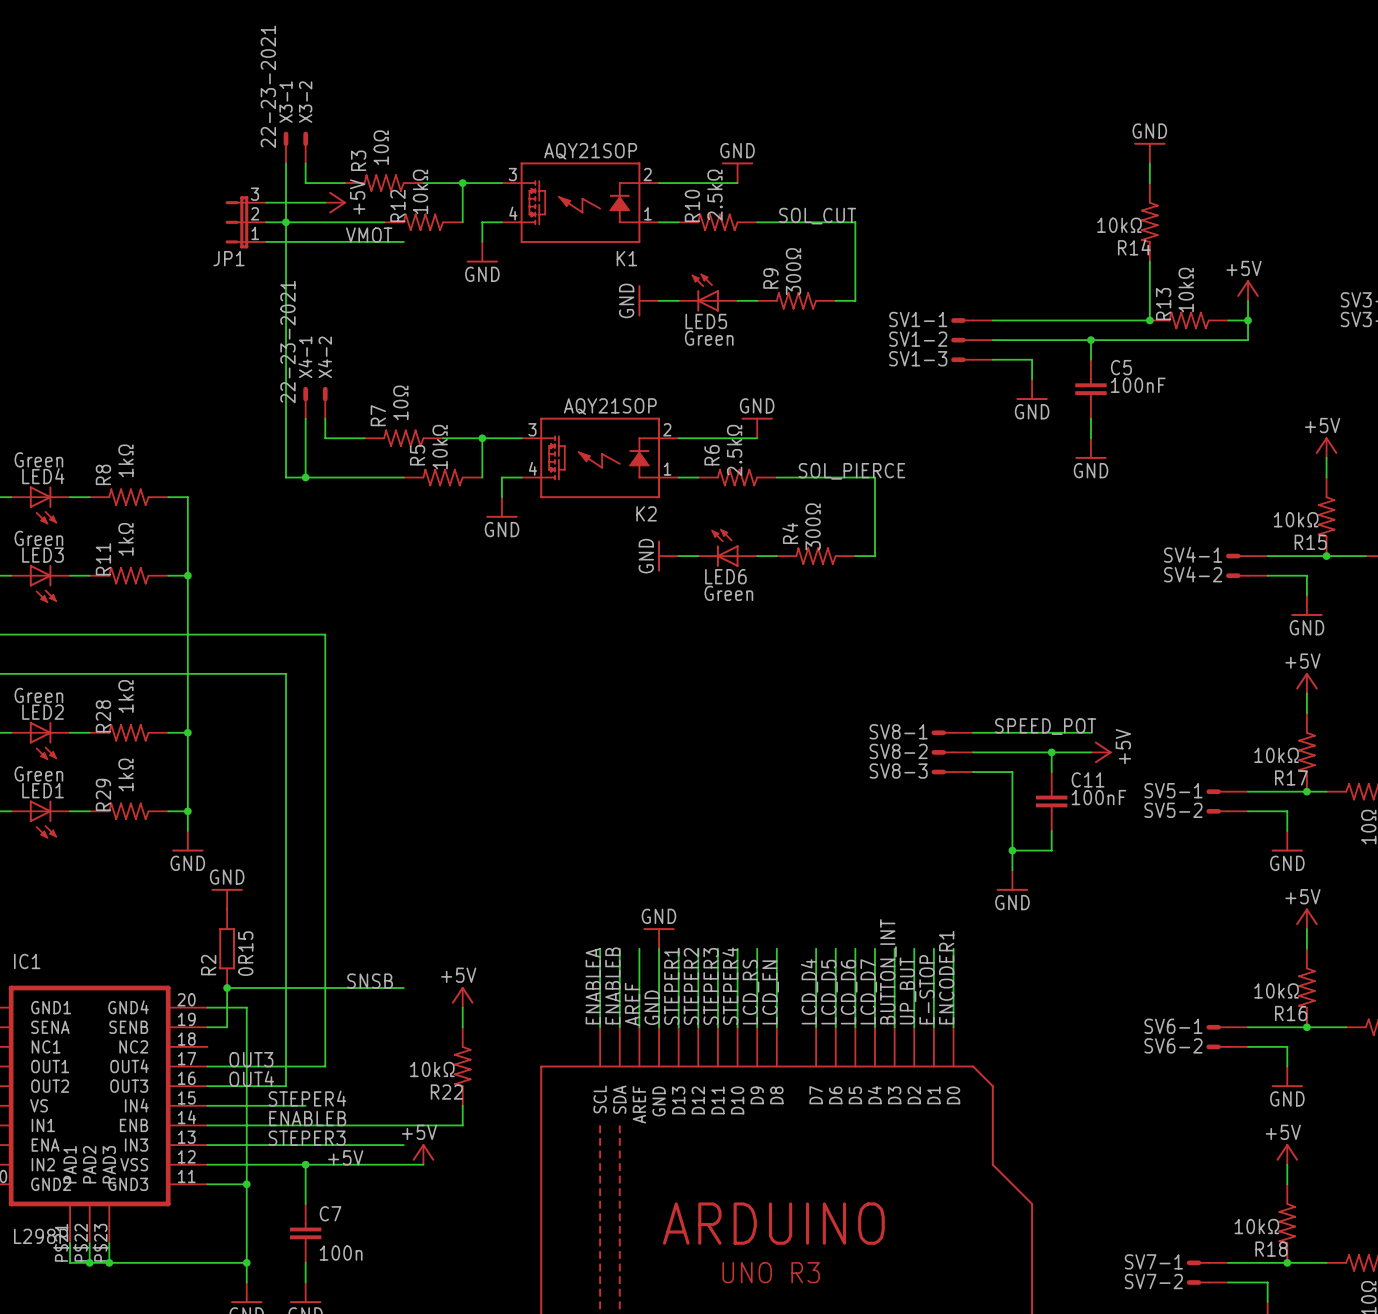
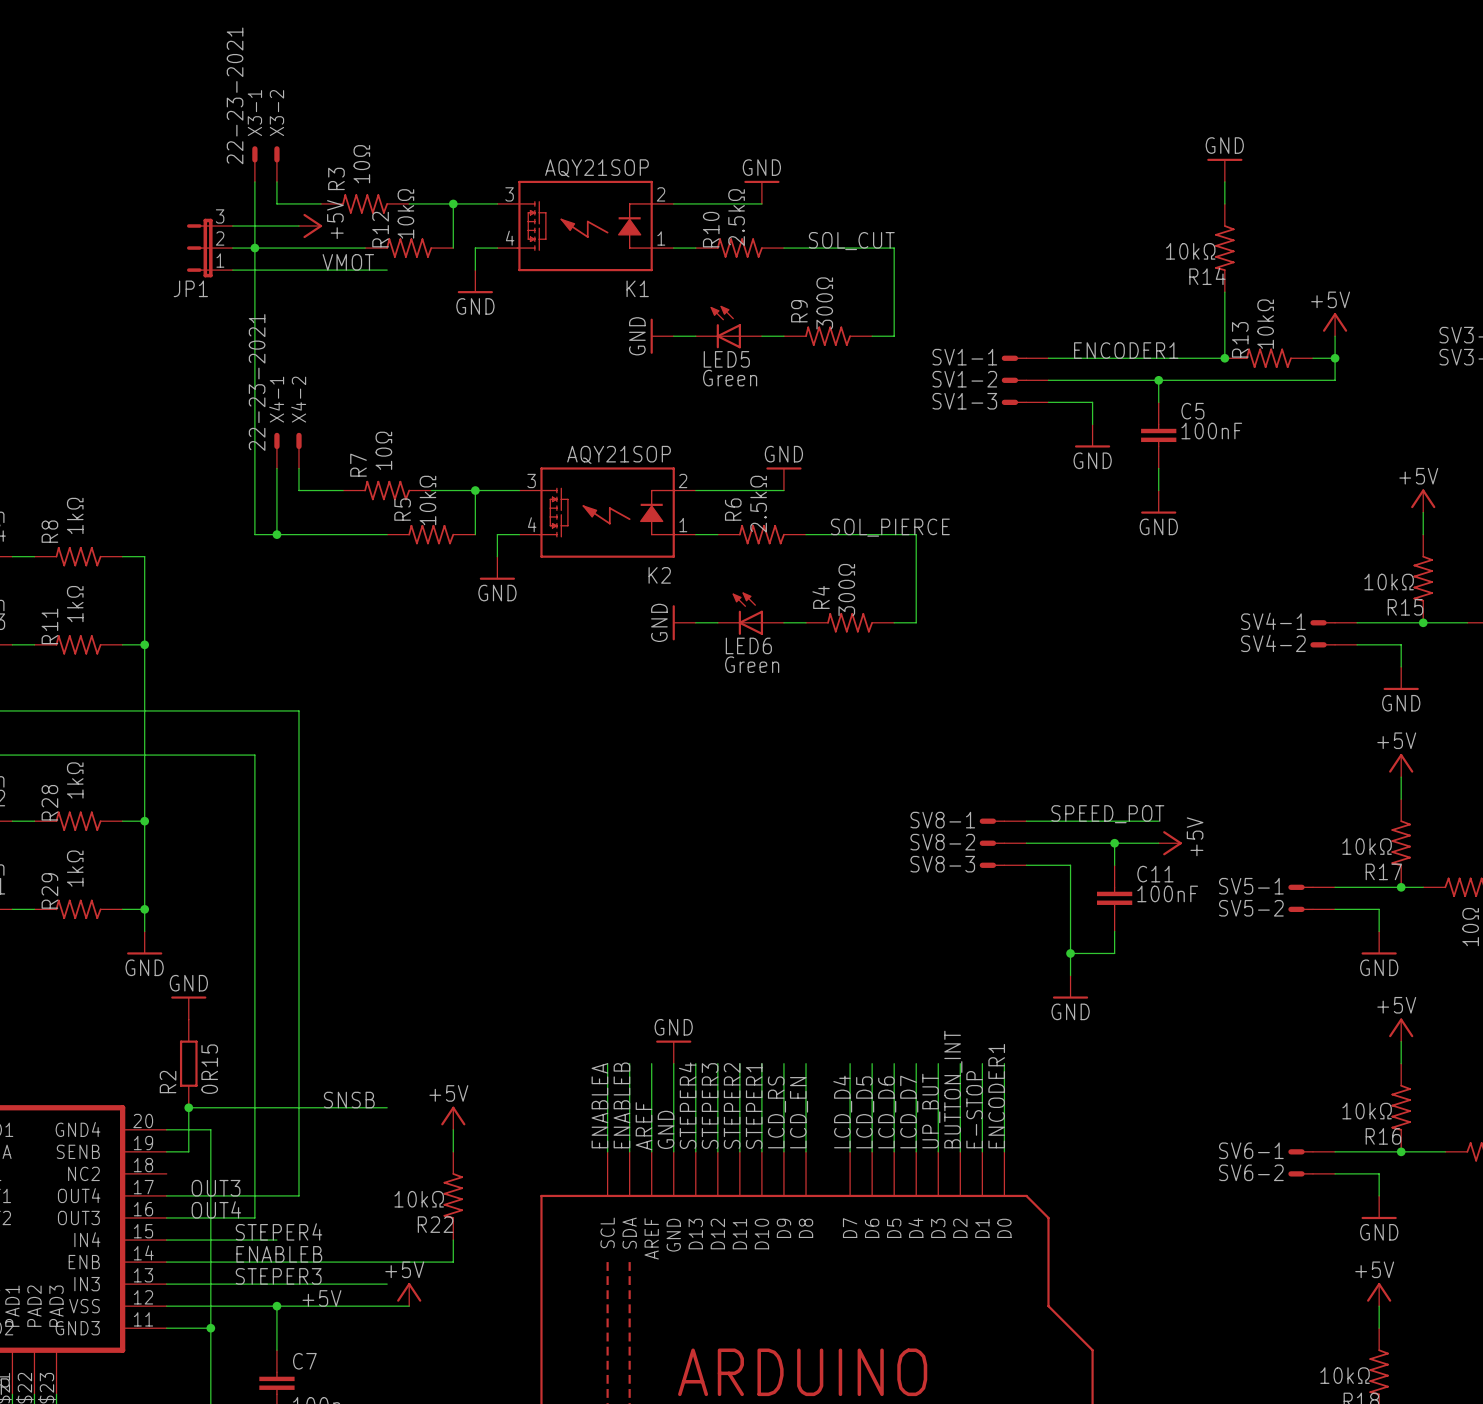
label: none -> ENCODER1 (1126, 350)
label: BUTTON_INT (888, 971) -> UP_BUT (931, 1111)
label: STEPER1 (671, 986) -> STEPER4 (687, 1105)
label: STEPER2 (691, 986) -> STEPER3 (710, 1106)
label: STEPER3 (711, 986) -> STEPER2 (732, 1106)
label: STEPER4 (730, 986) -> STEPER1 (754, 1106)
label: UP_BUT (908, 990) -> BUTTON_INT (953, 1089)

